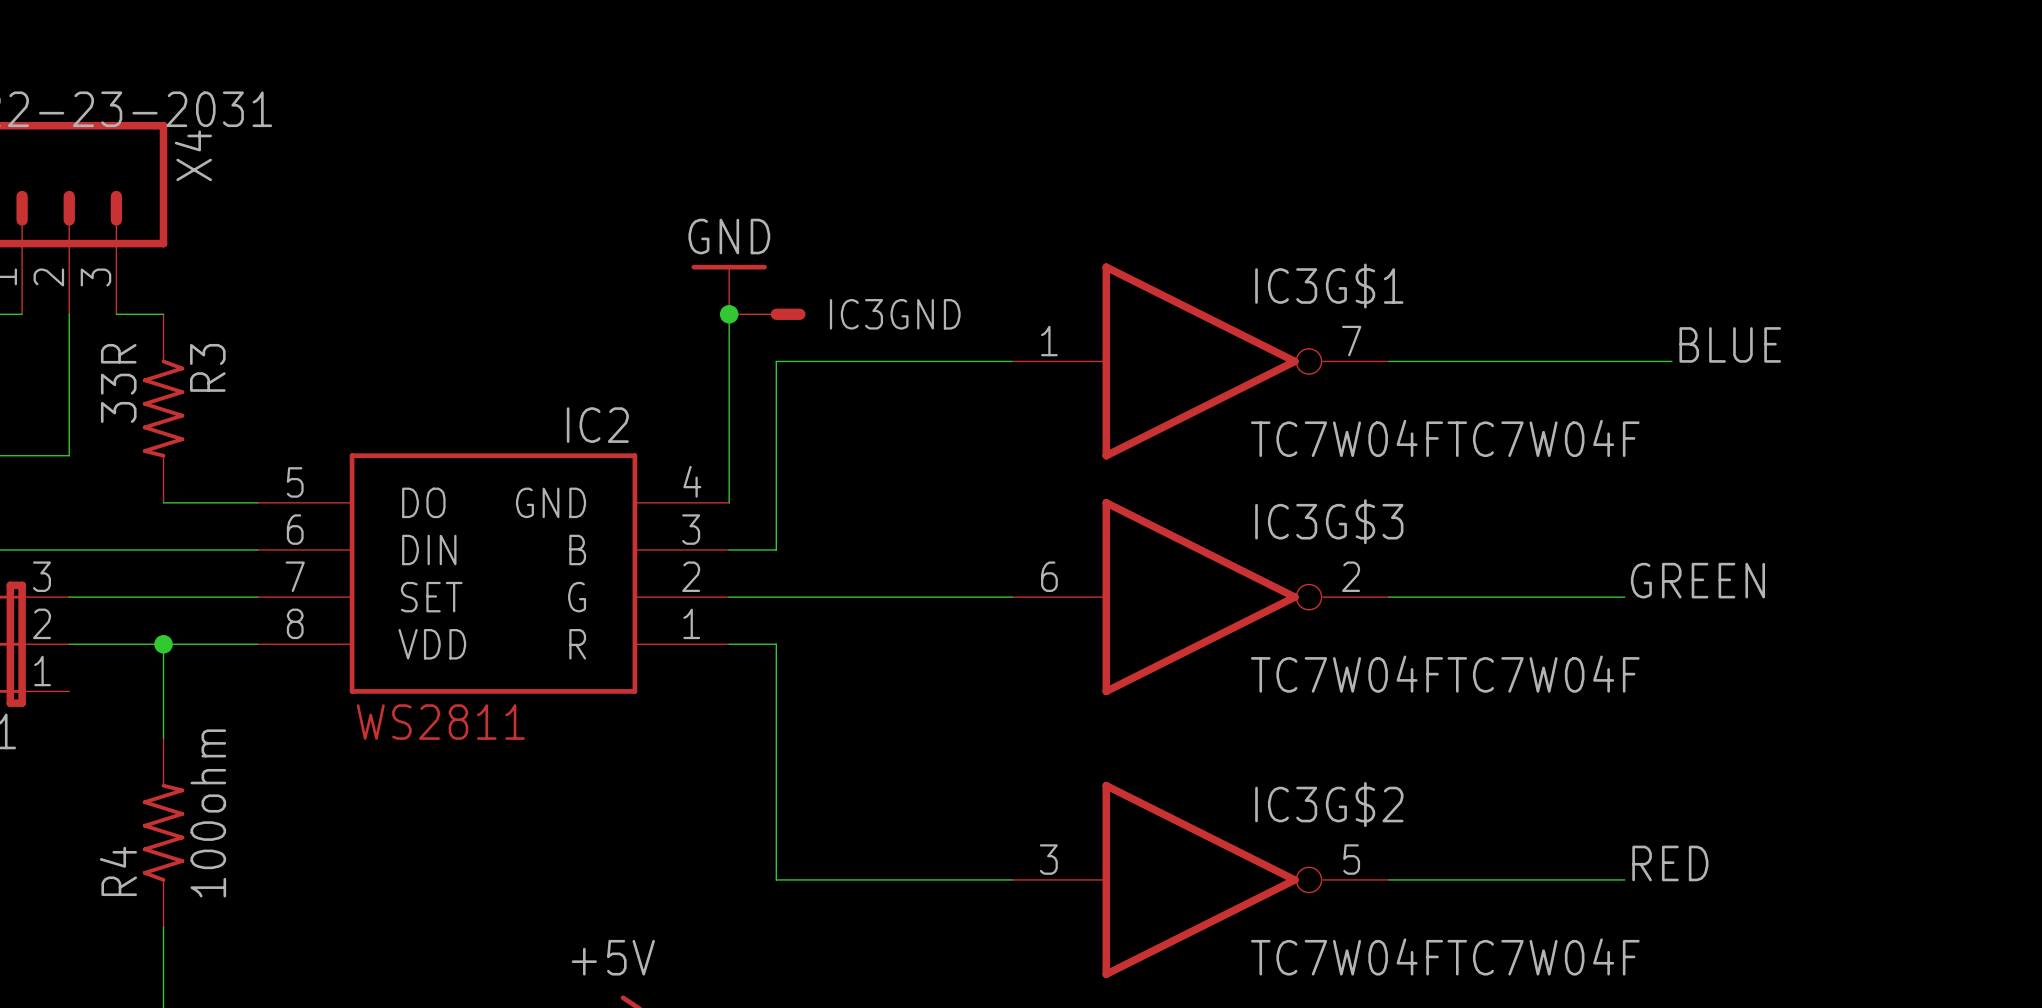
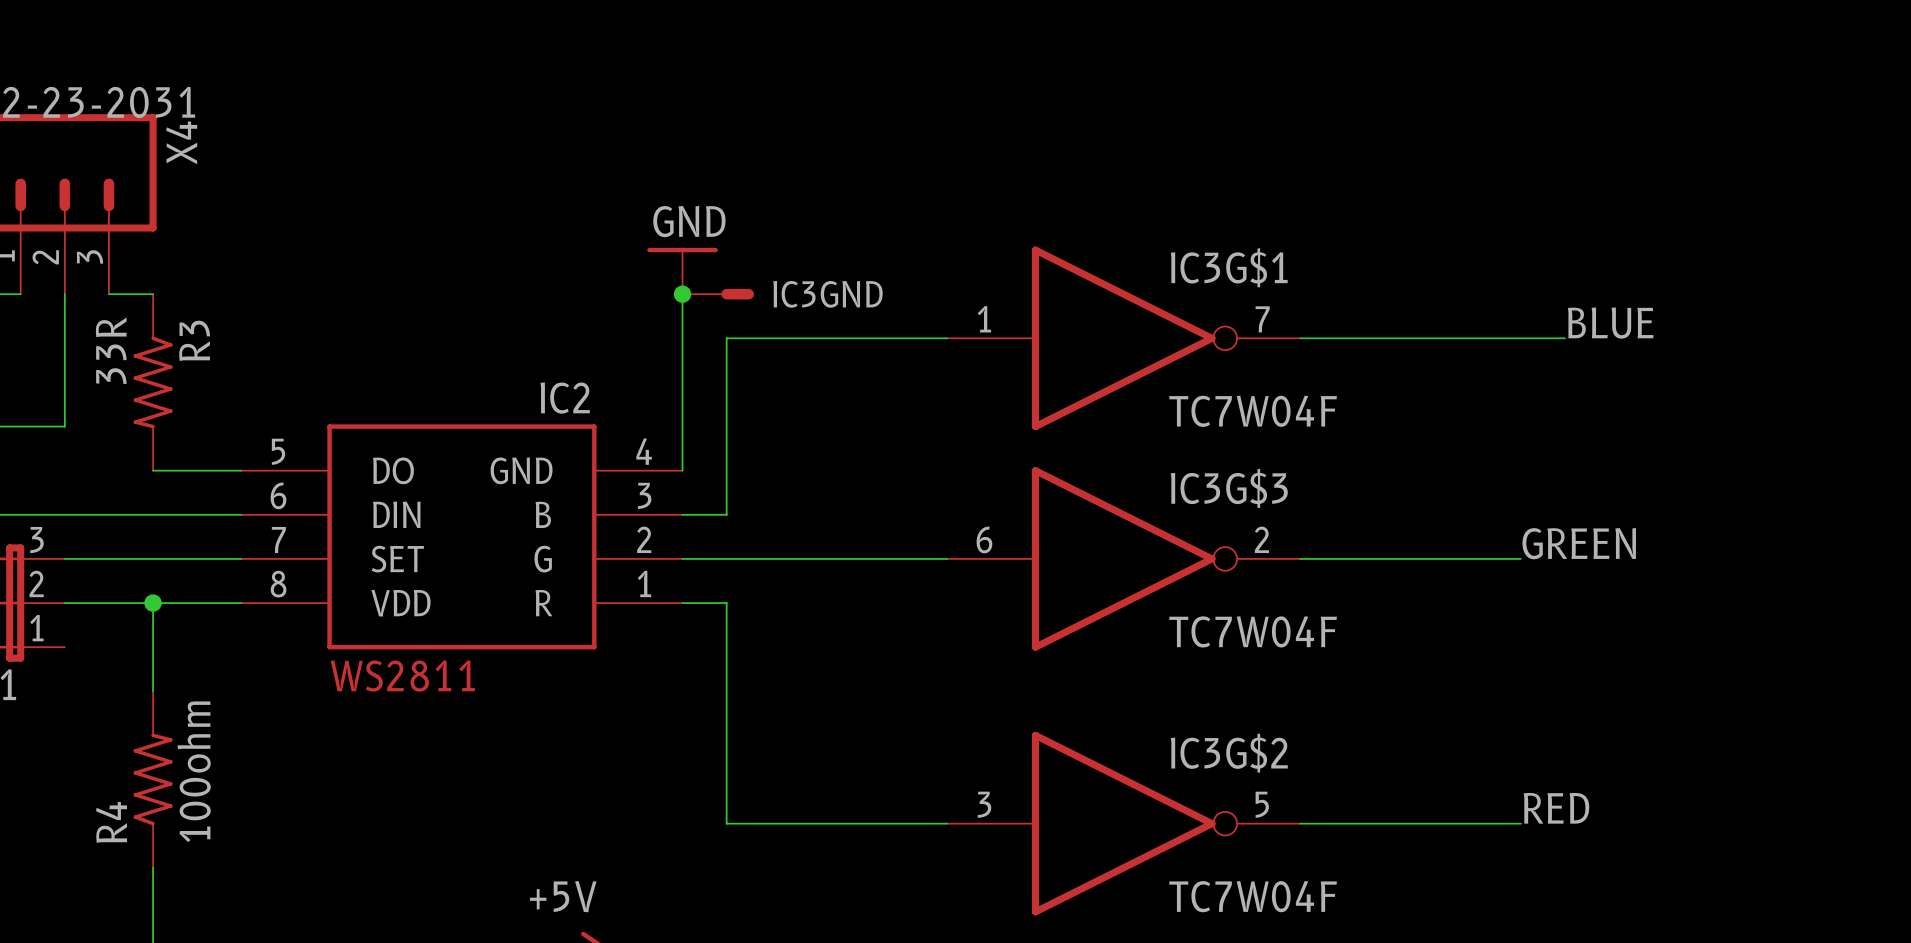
IC3G$1 value: TC7W04FTC7W04F (1445, 438) -> TC7W04F (1253, 411)
IC3G$3 value: TC7W04FTC7W04F (1445, 674) -> TC7W04F (1253, 631)
IC3G$2 value: TC7W04FTC7W04F (1445, 956) -> TC7W04F (1253, 896)

